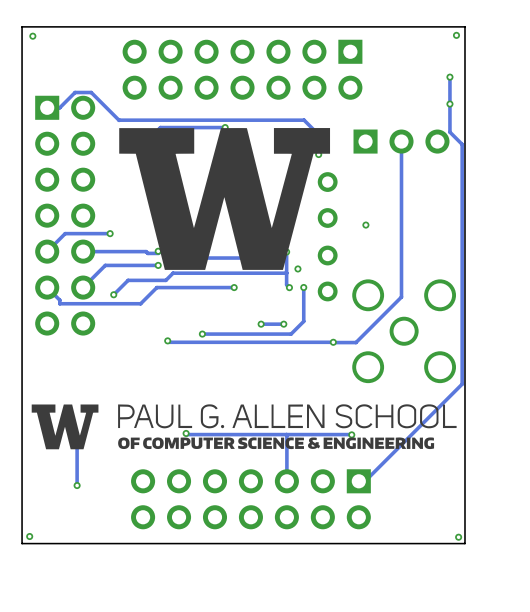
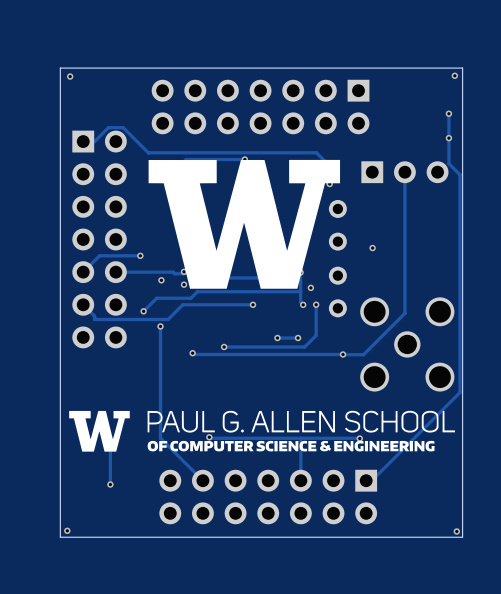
via: none -> (161, 280)
track: (158, 265) (105, 265) (83, 287) -> none
track: none -> (160, 326) (160, 438) (202, 480)
via: none -> (160, 326)

